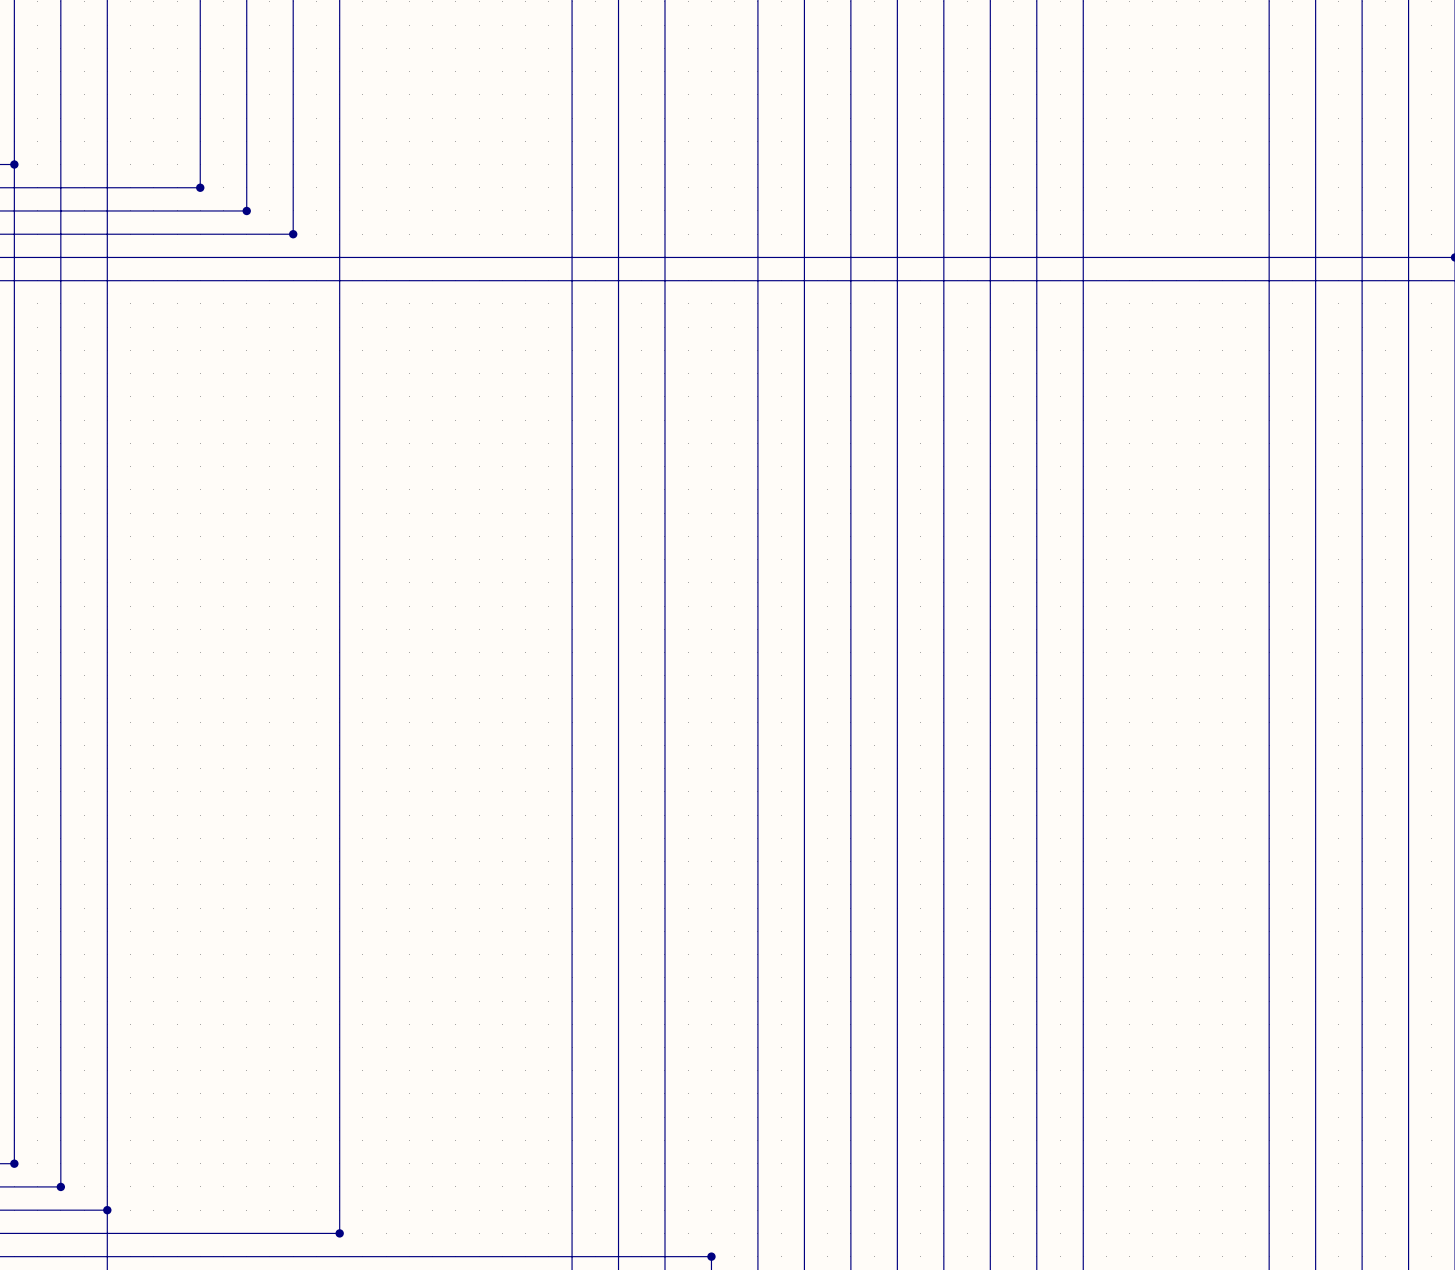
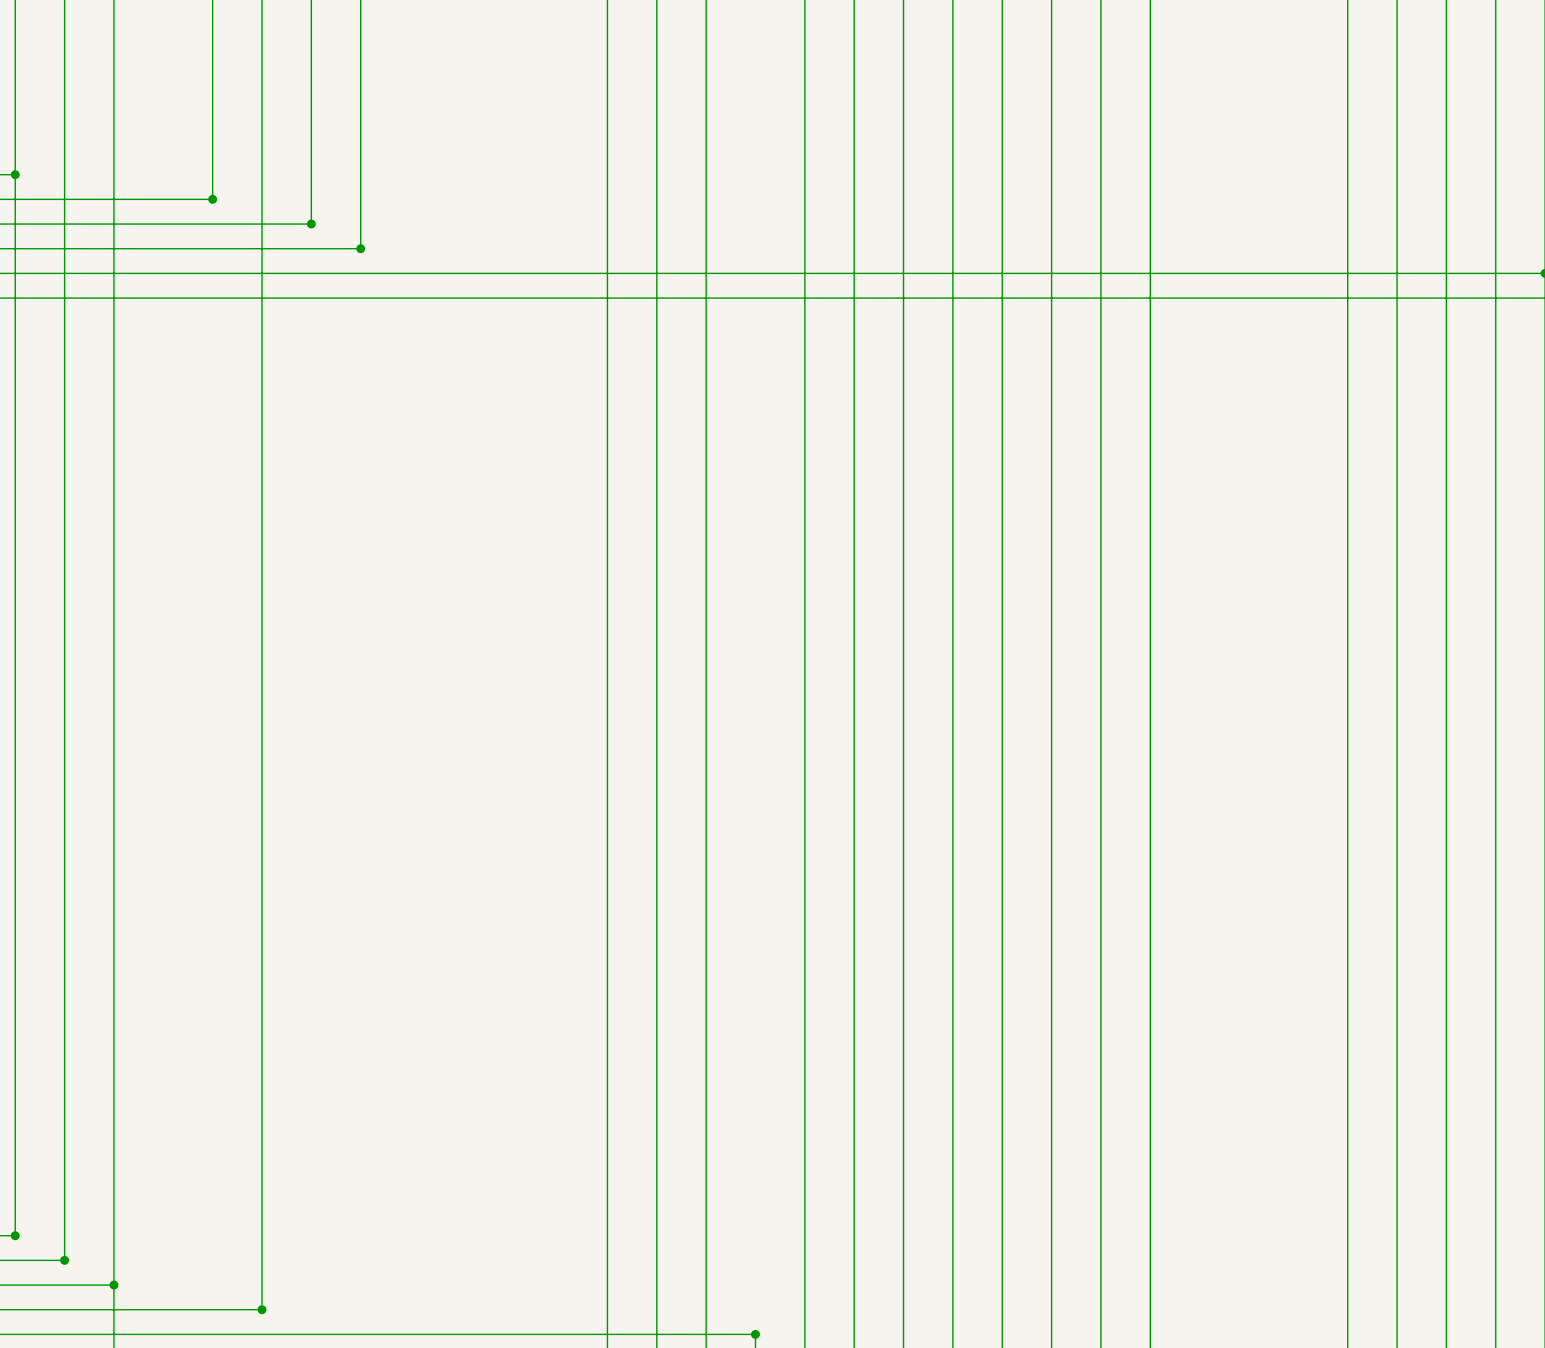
junction: (246, 210) -> none
wire: (293, 210) (293, 234) -> (360, 248) (311, 248)
junction: none -> (311, 224)
junction: (293, 234) -> none
wire: (339, 234) (339, 1233) (246, 1233) -> (311, 224) (261, 224) (261, 1309)
junction: none -> (360, 248)
junction: none -> (261, 1309)
junction: (339, 1233) -> none

